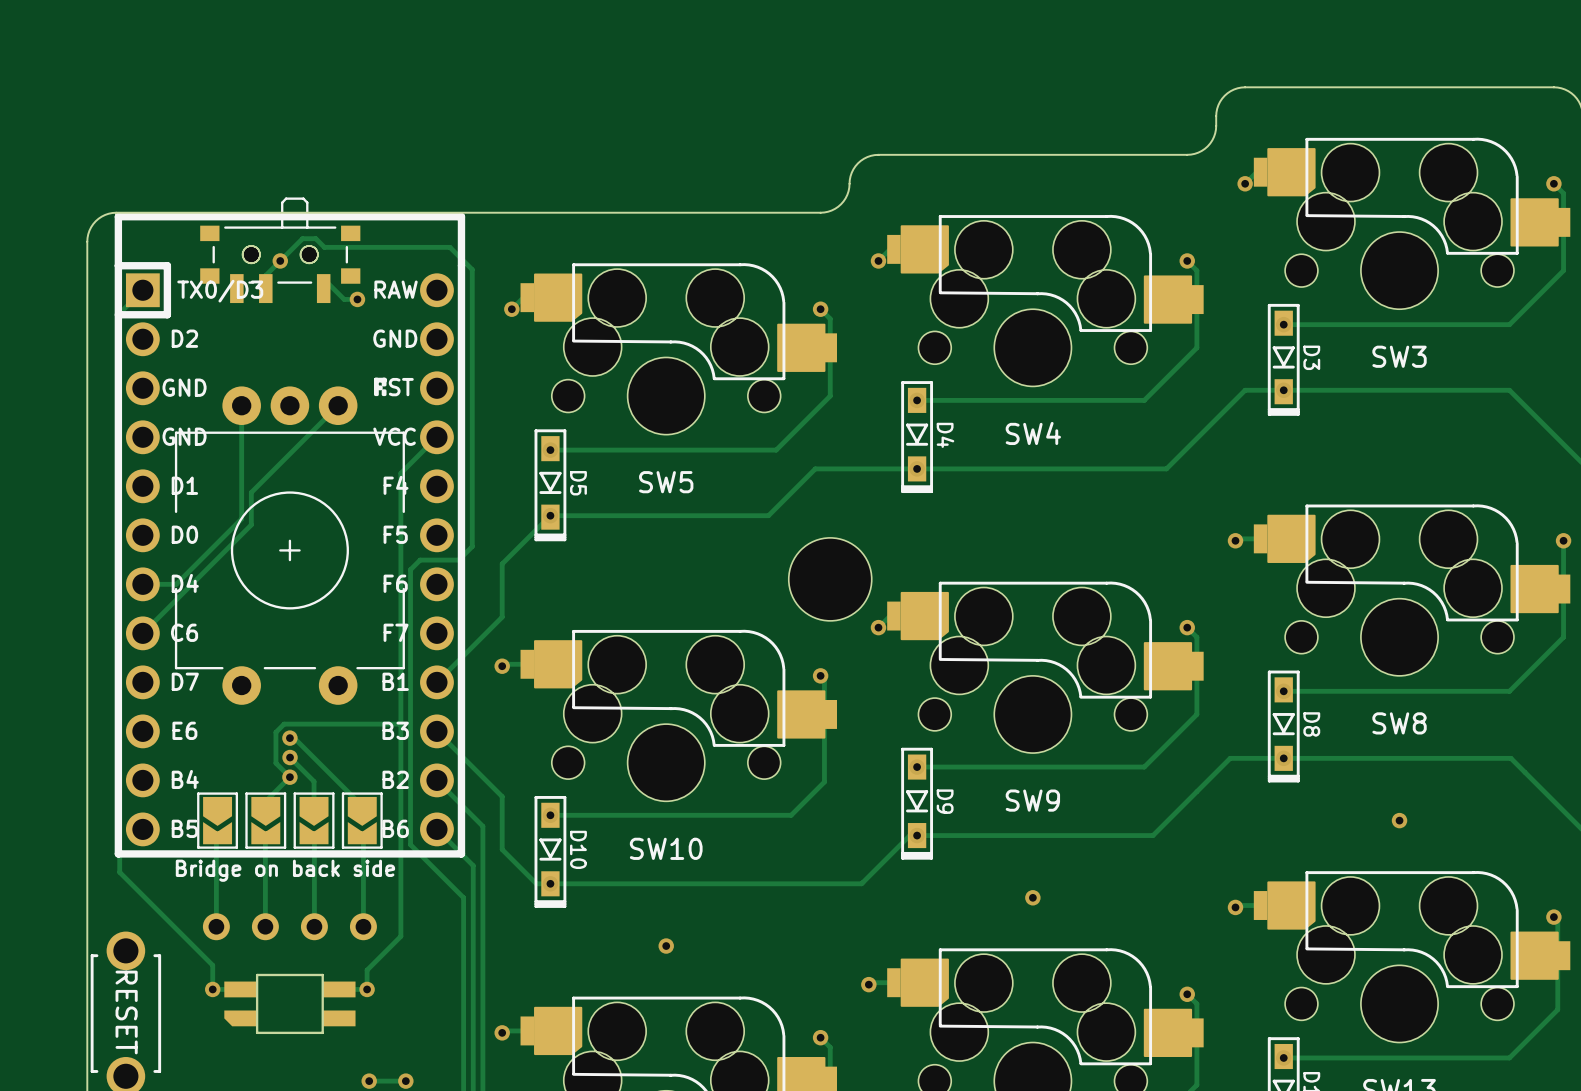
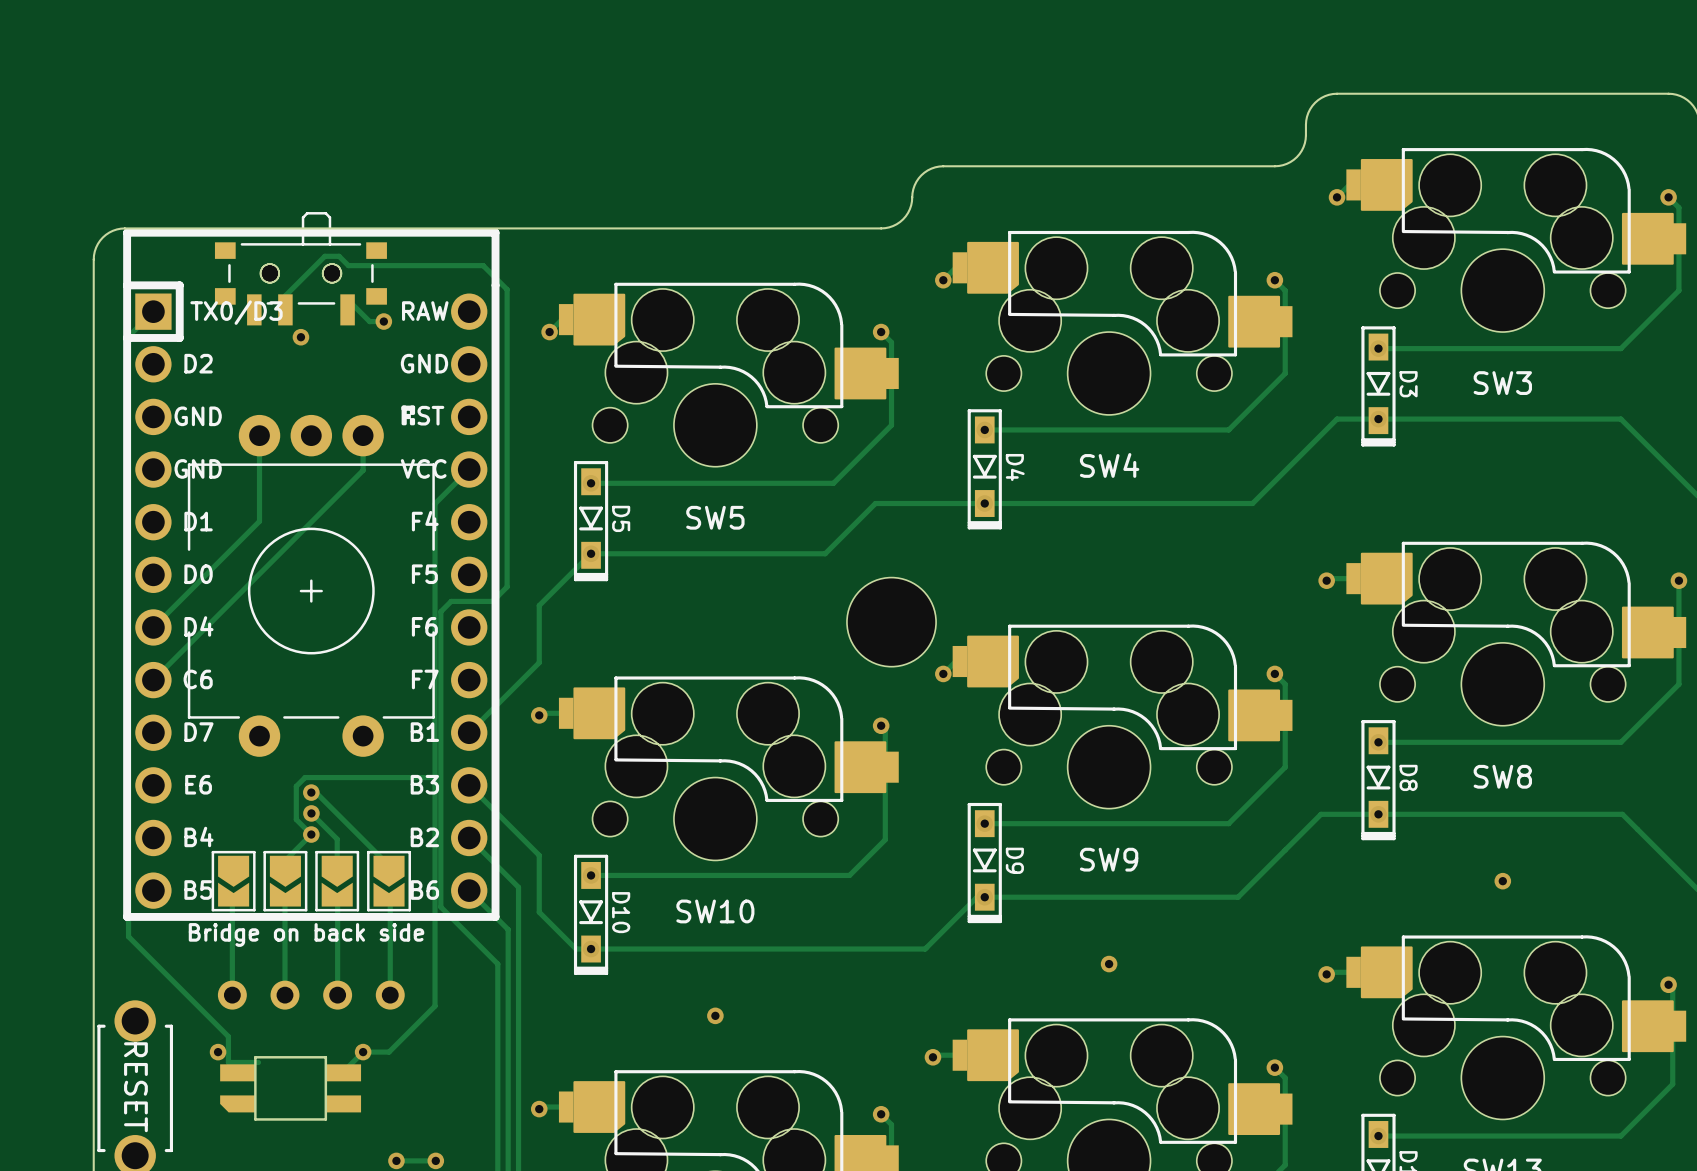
via position: (280, 260) -> (300, 337)
track: (338, 405) (251, 492) (251, 524) -> (363, 435) (363, 470) (269, 563)
track: (436, 437) (400, 473) (400, 936) (367, 970) (367, 989) (339, 989) -> (469, 469) (435, 503) (435, 1006) (389, 1052) (363, 1052) (342, 1072)
track: (241, 485) (241, 518) (176, 584) (142, 584) -> (259, 521) (153, 627)
via position: (212, 989) -> (218, 1052)
via position: (367, 989) -> (363, 1052)
part position: (289, 1003) -> (290, 1088)

